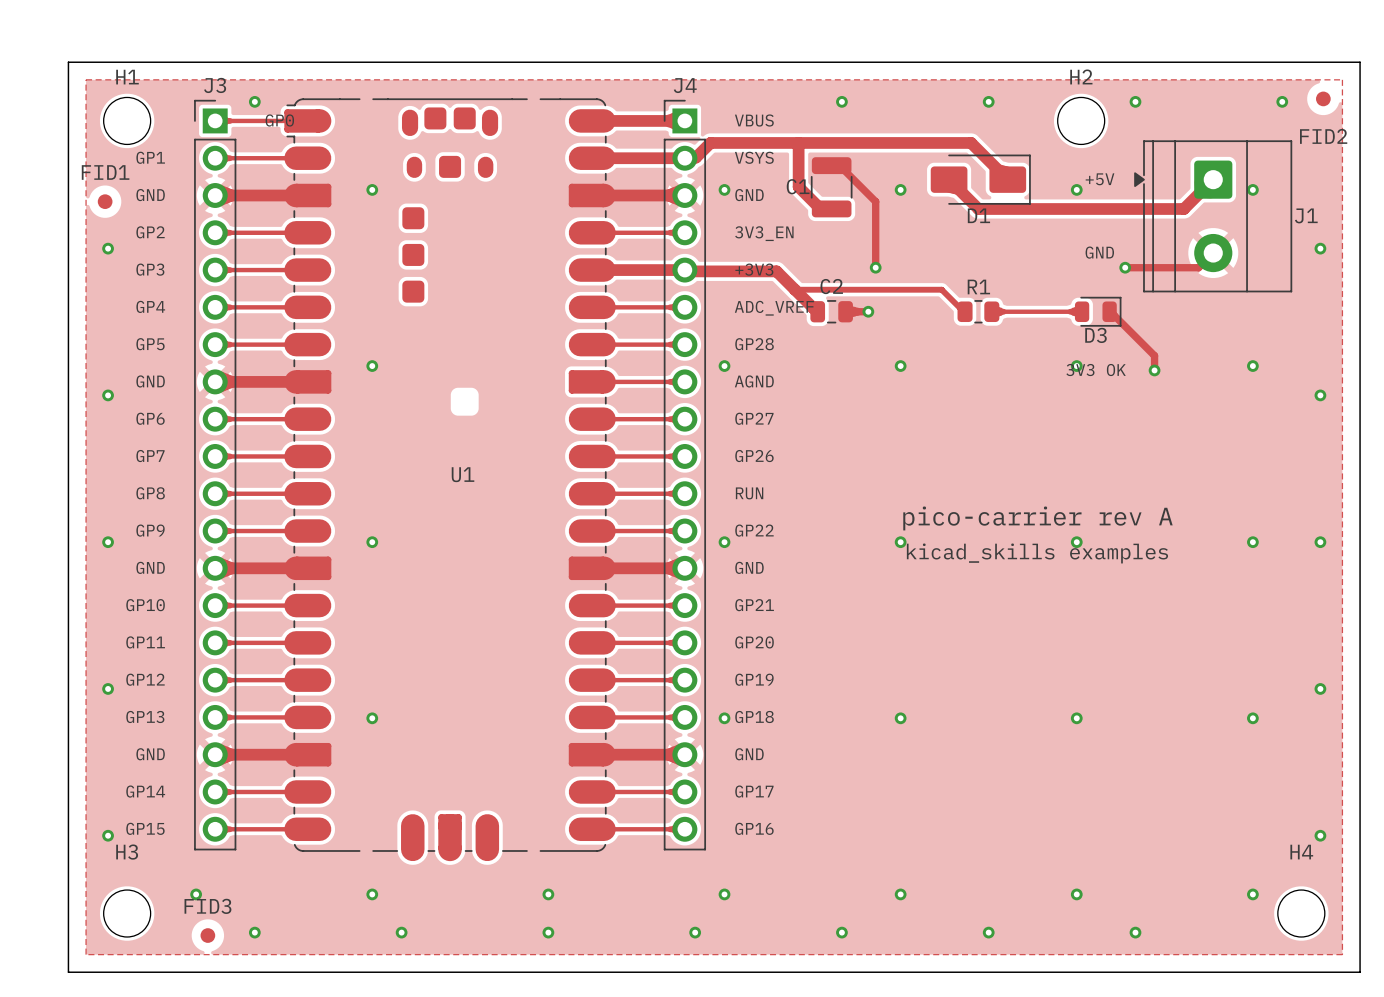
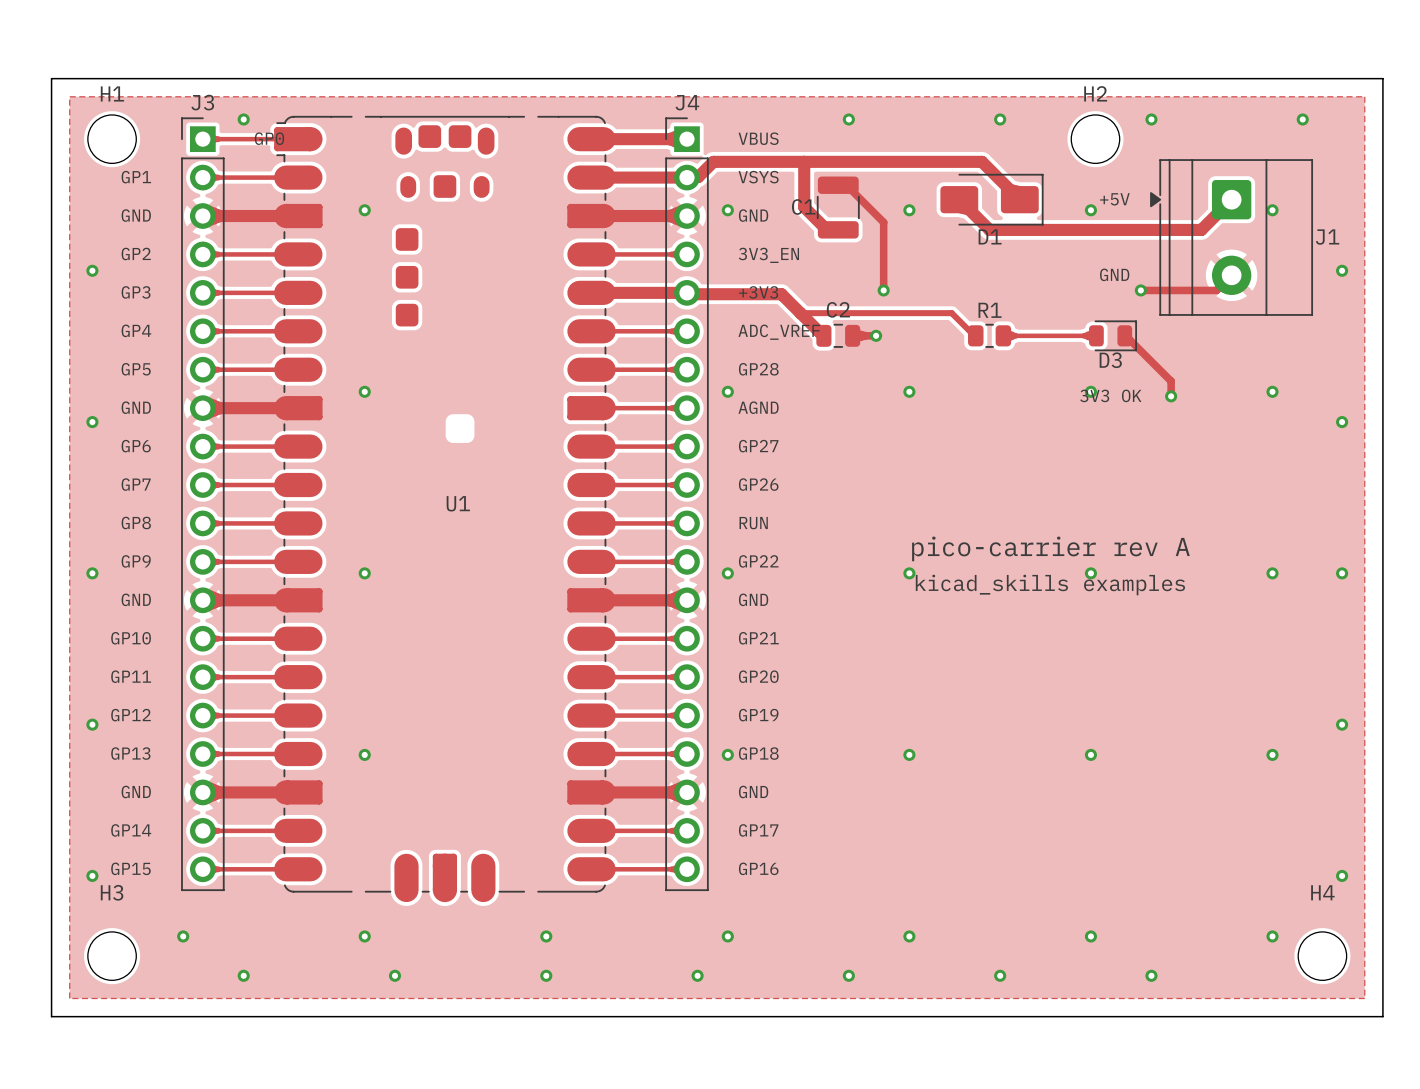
FID2: (1323, 98) -> none
FID1: (105, 201) -> none
FID3: (207, 935) -> none

